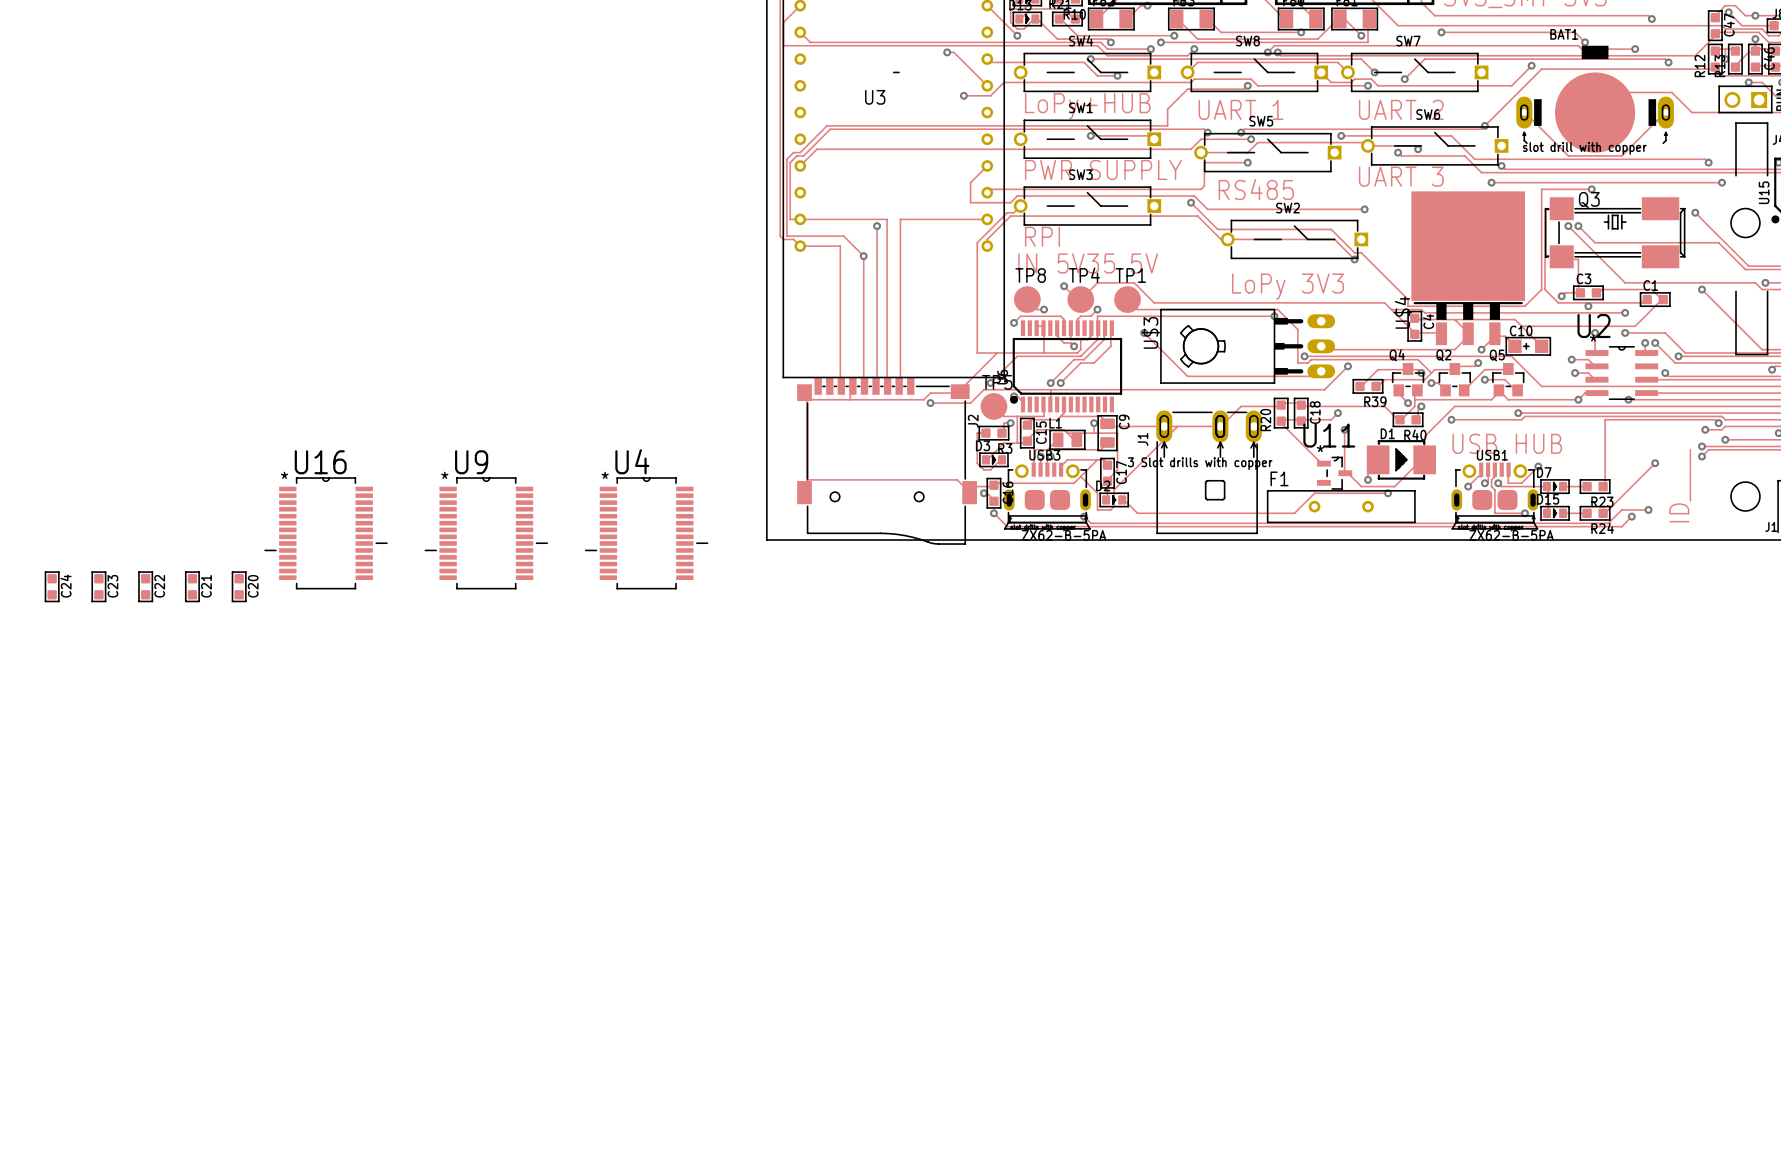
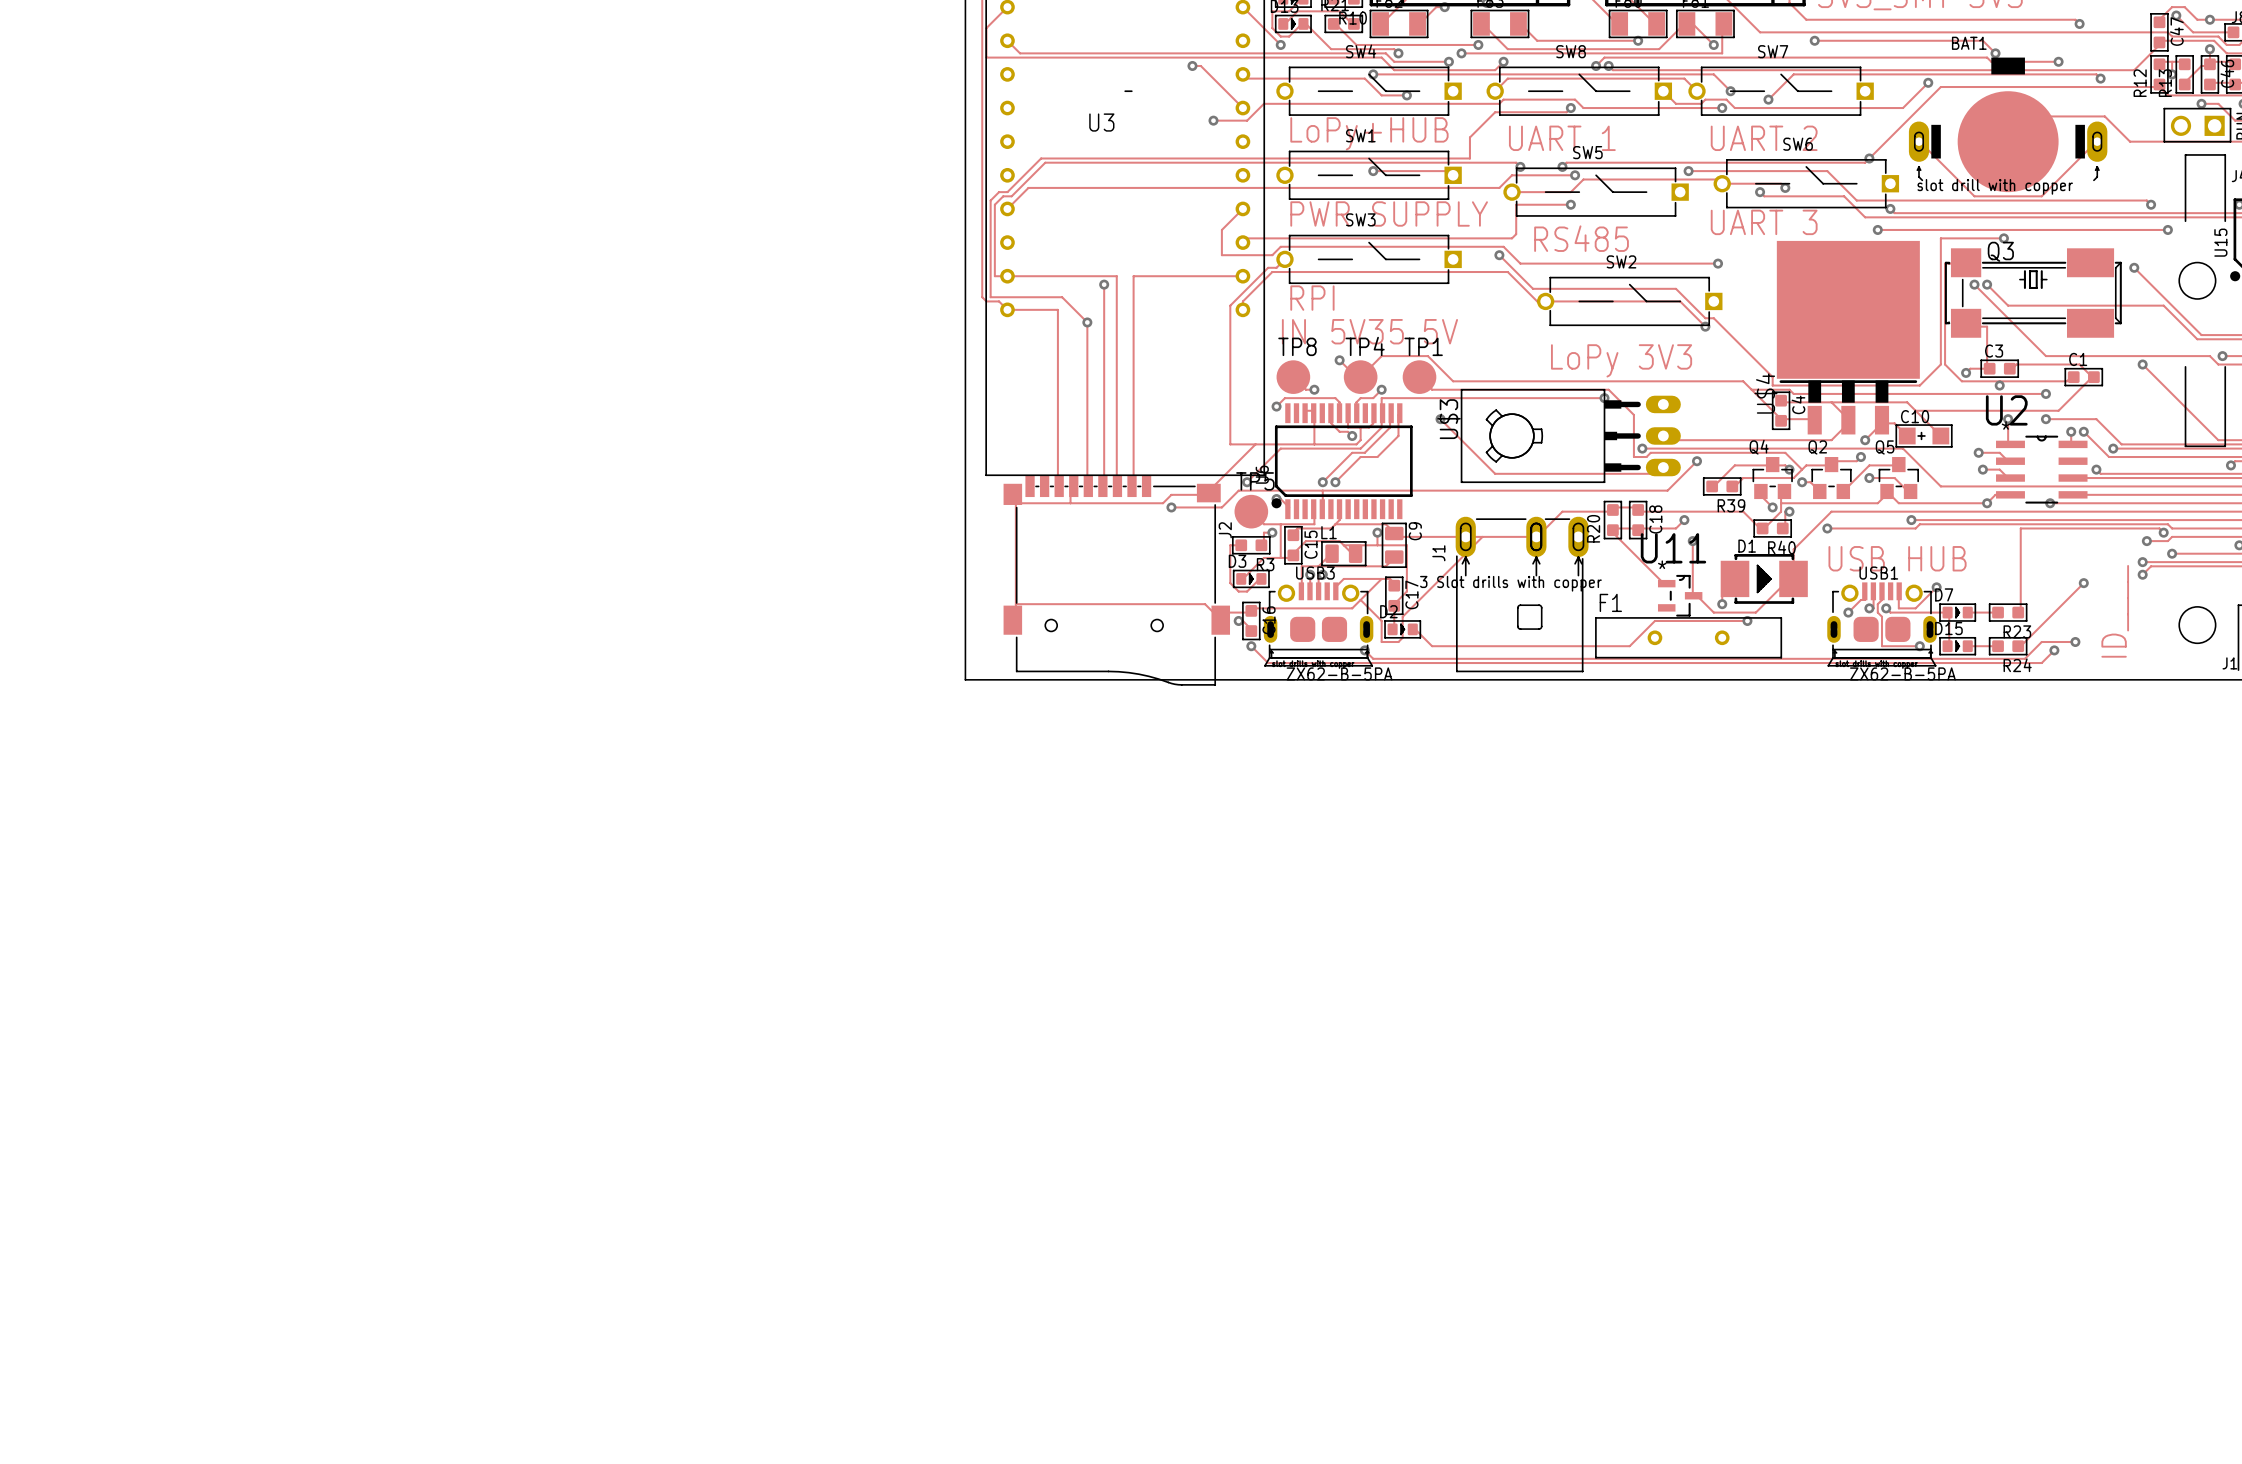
U16: (326, 533) -> none
U9: (486, 533) -> none
U4: (646, 533) -> none
C24: (52, 586) -> none
C23: (98, 586) -> none
C22: (145, 586) -> none
C21: (192, 586) -> none
C20: (239, 586) -> none

